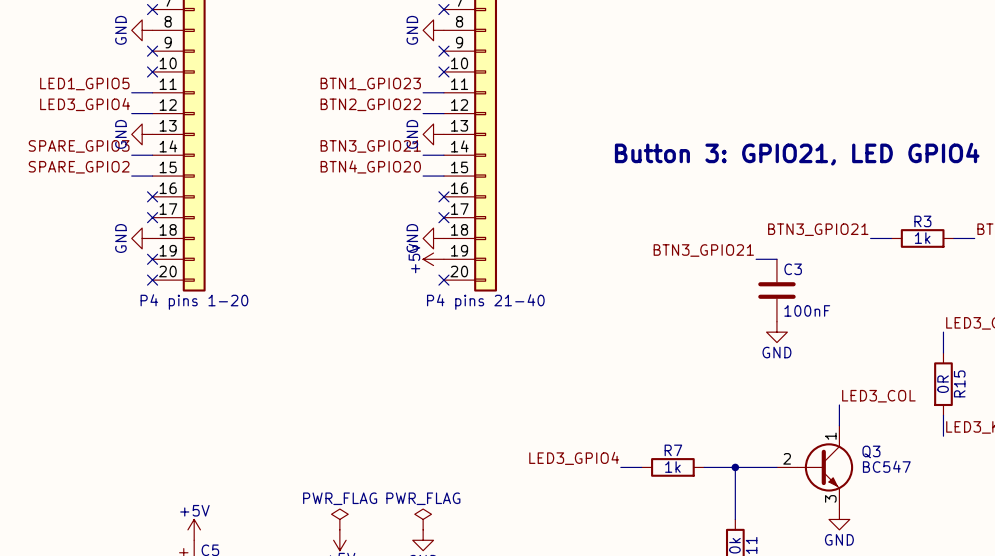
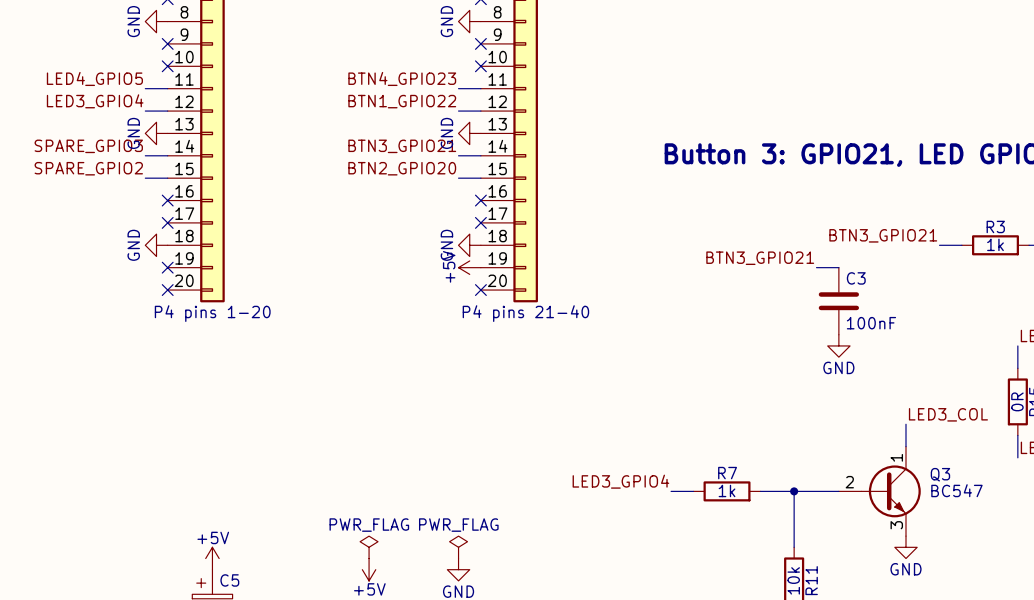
label: LED1_GPIO5 (84, 83) -> LED4_GPIO5 (94, 78)
label: BTN1_GPIO23 (370, 83) -> BTN4_GPIO23 (402, 78)
label: BTN2_GPIO22 (370, 104) -> BTN1_GPIO22 (402, 101)
label: BTN4_GPIO20 (370, 167) -> BTN2_GPIO20 (402, 168)

